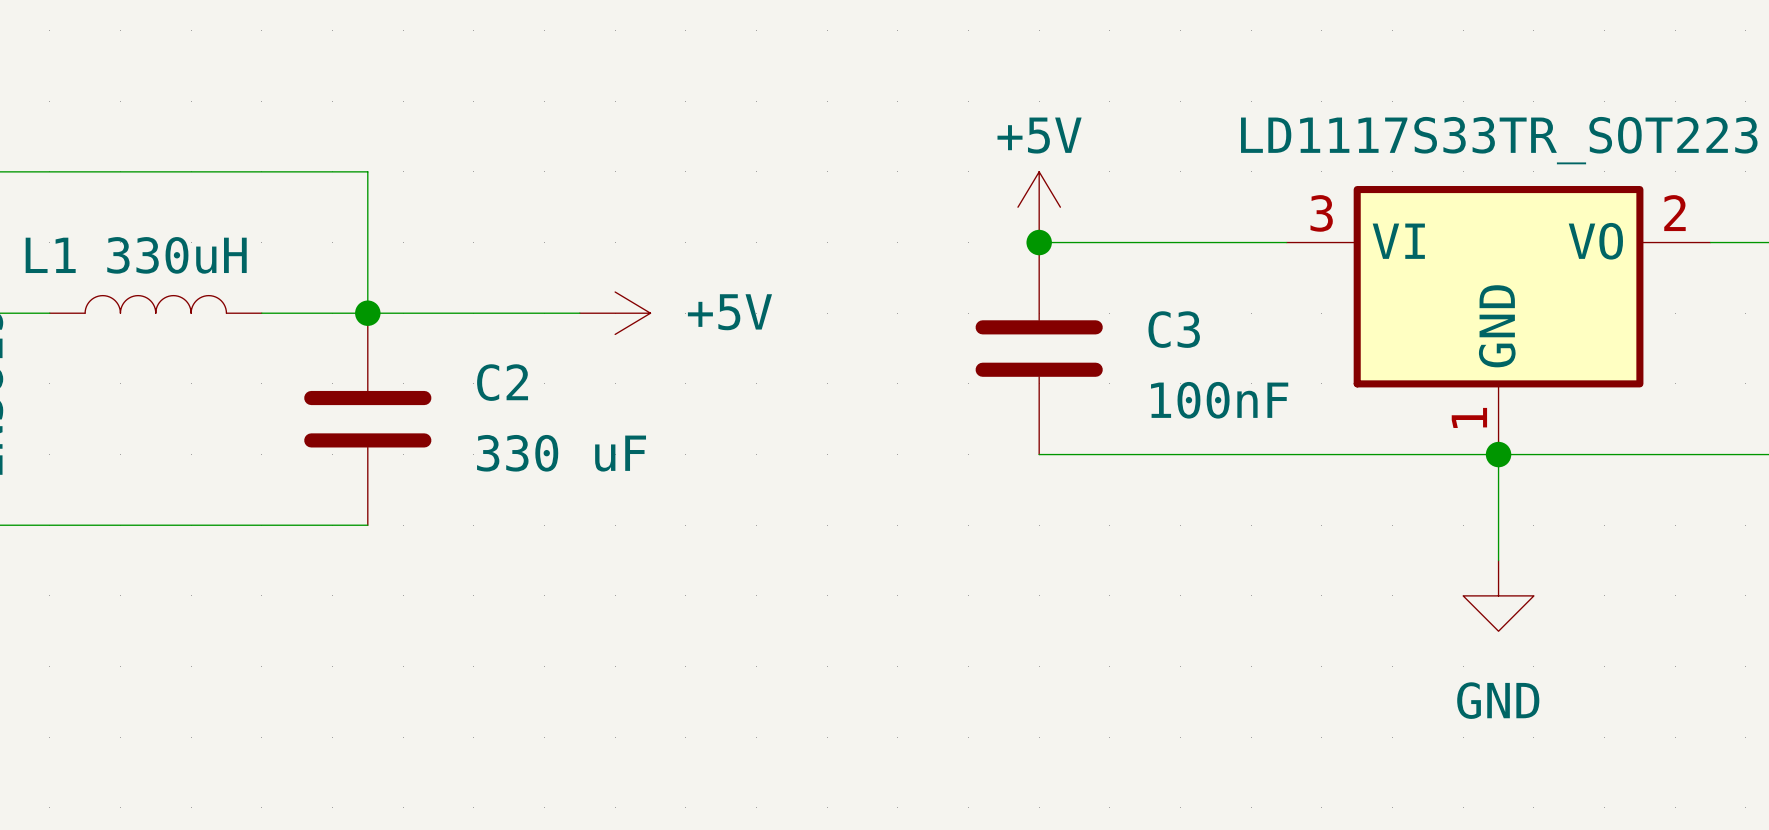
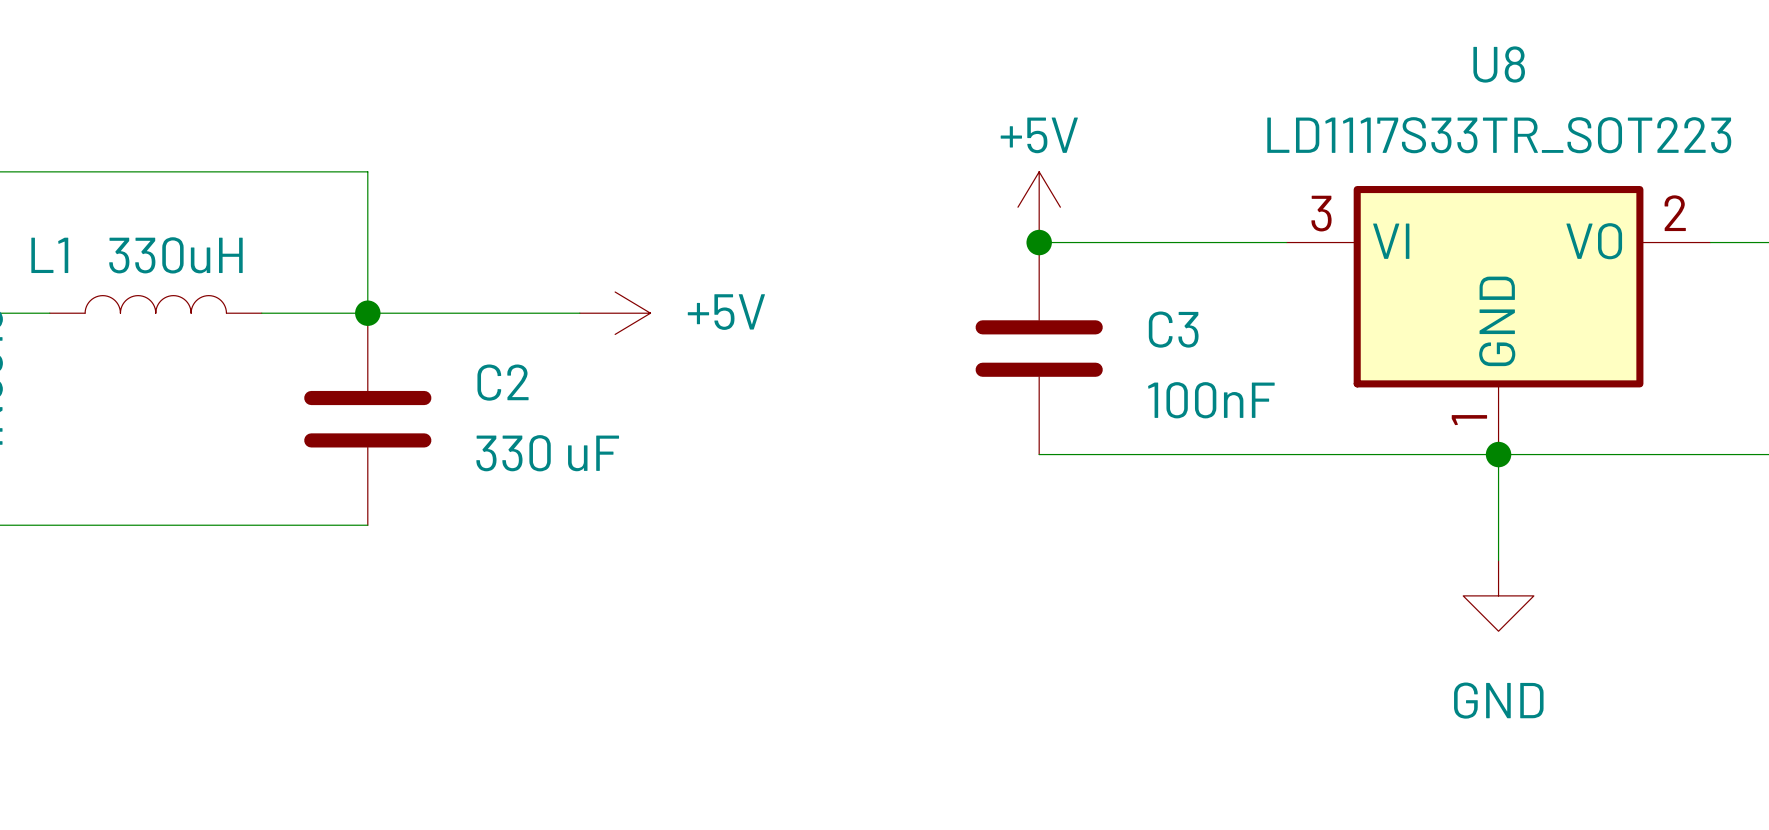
U8 name: none -> U8 (1499, 64)

